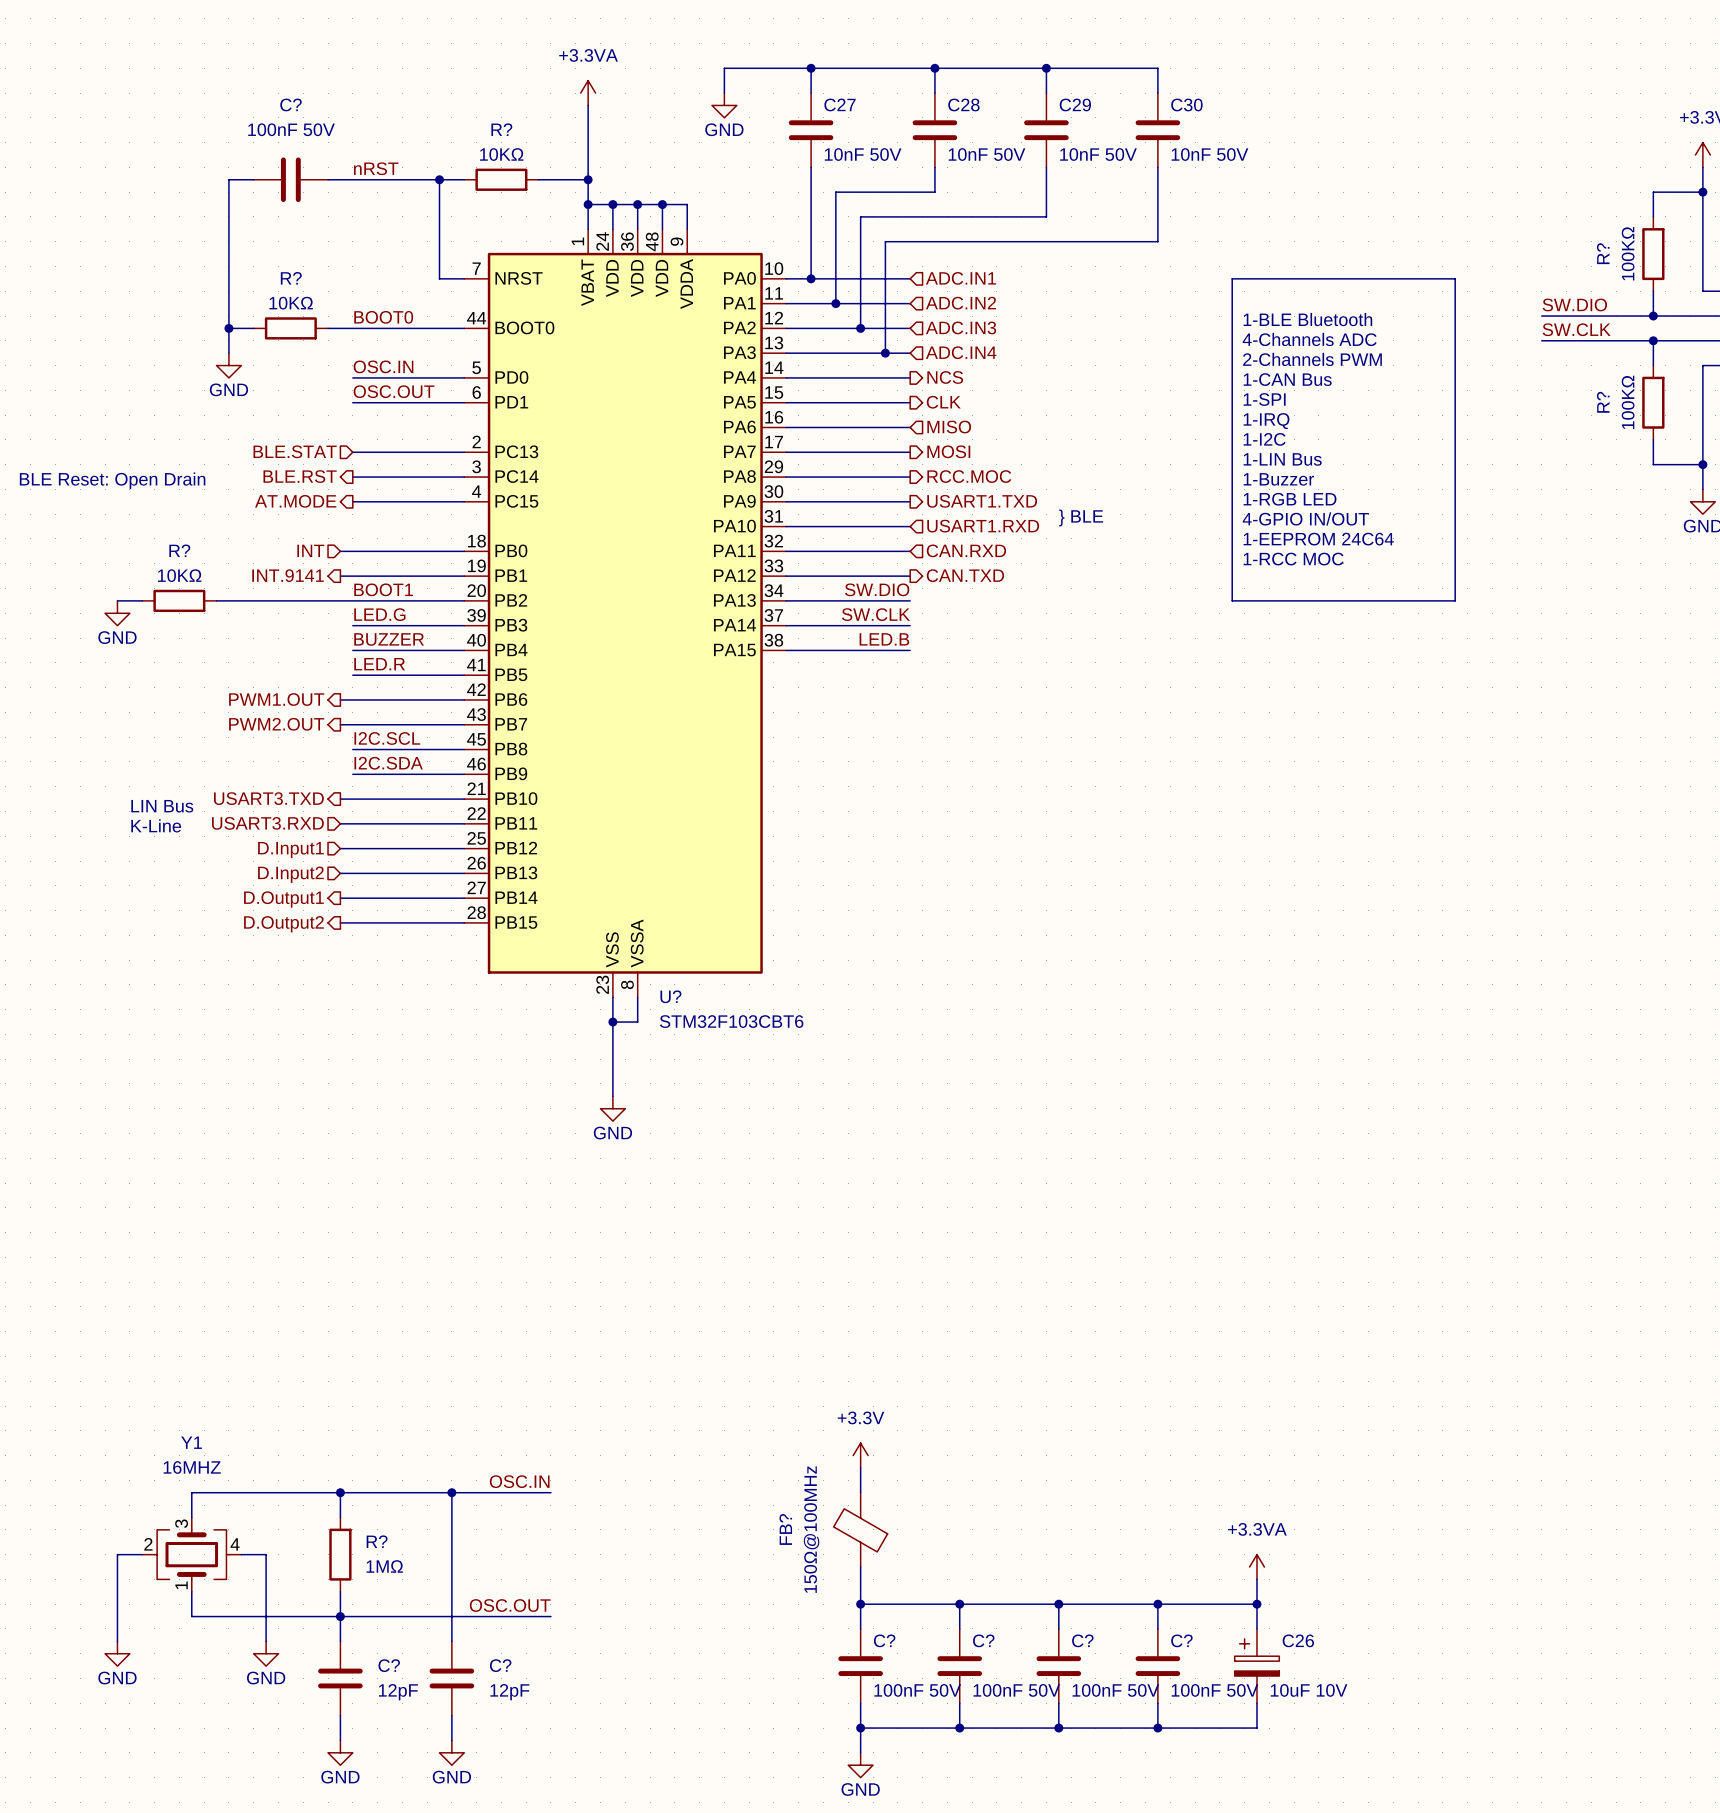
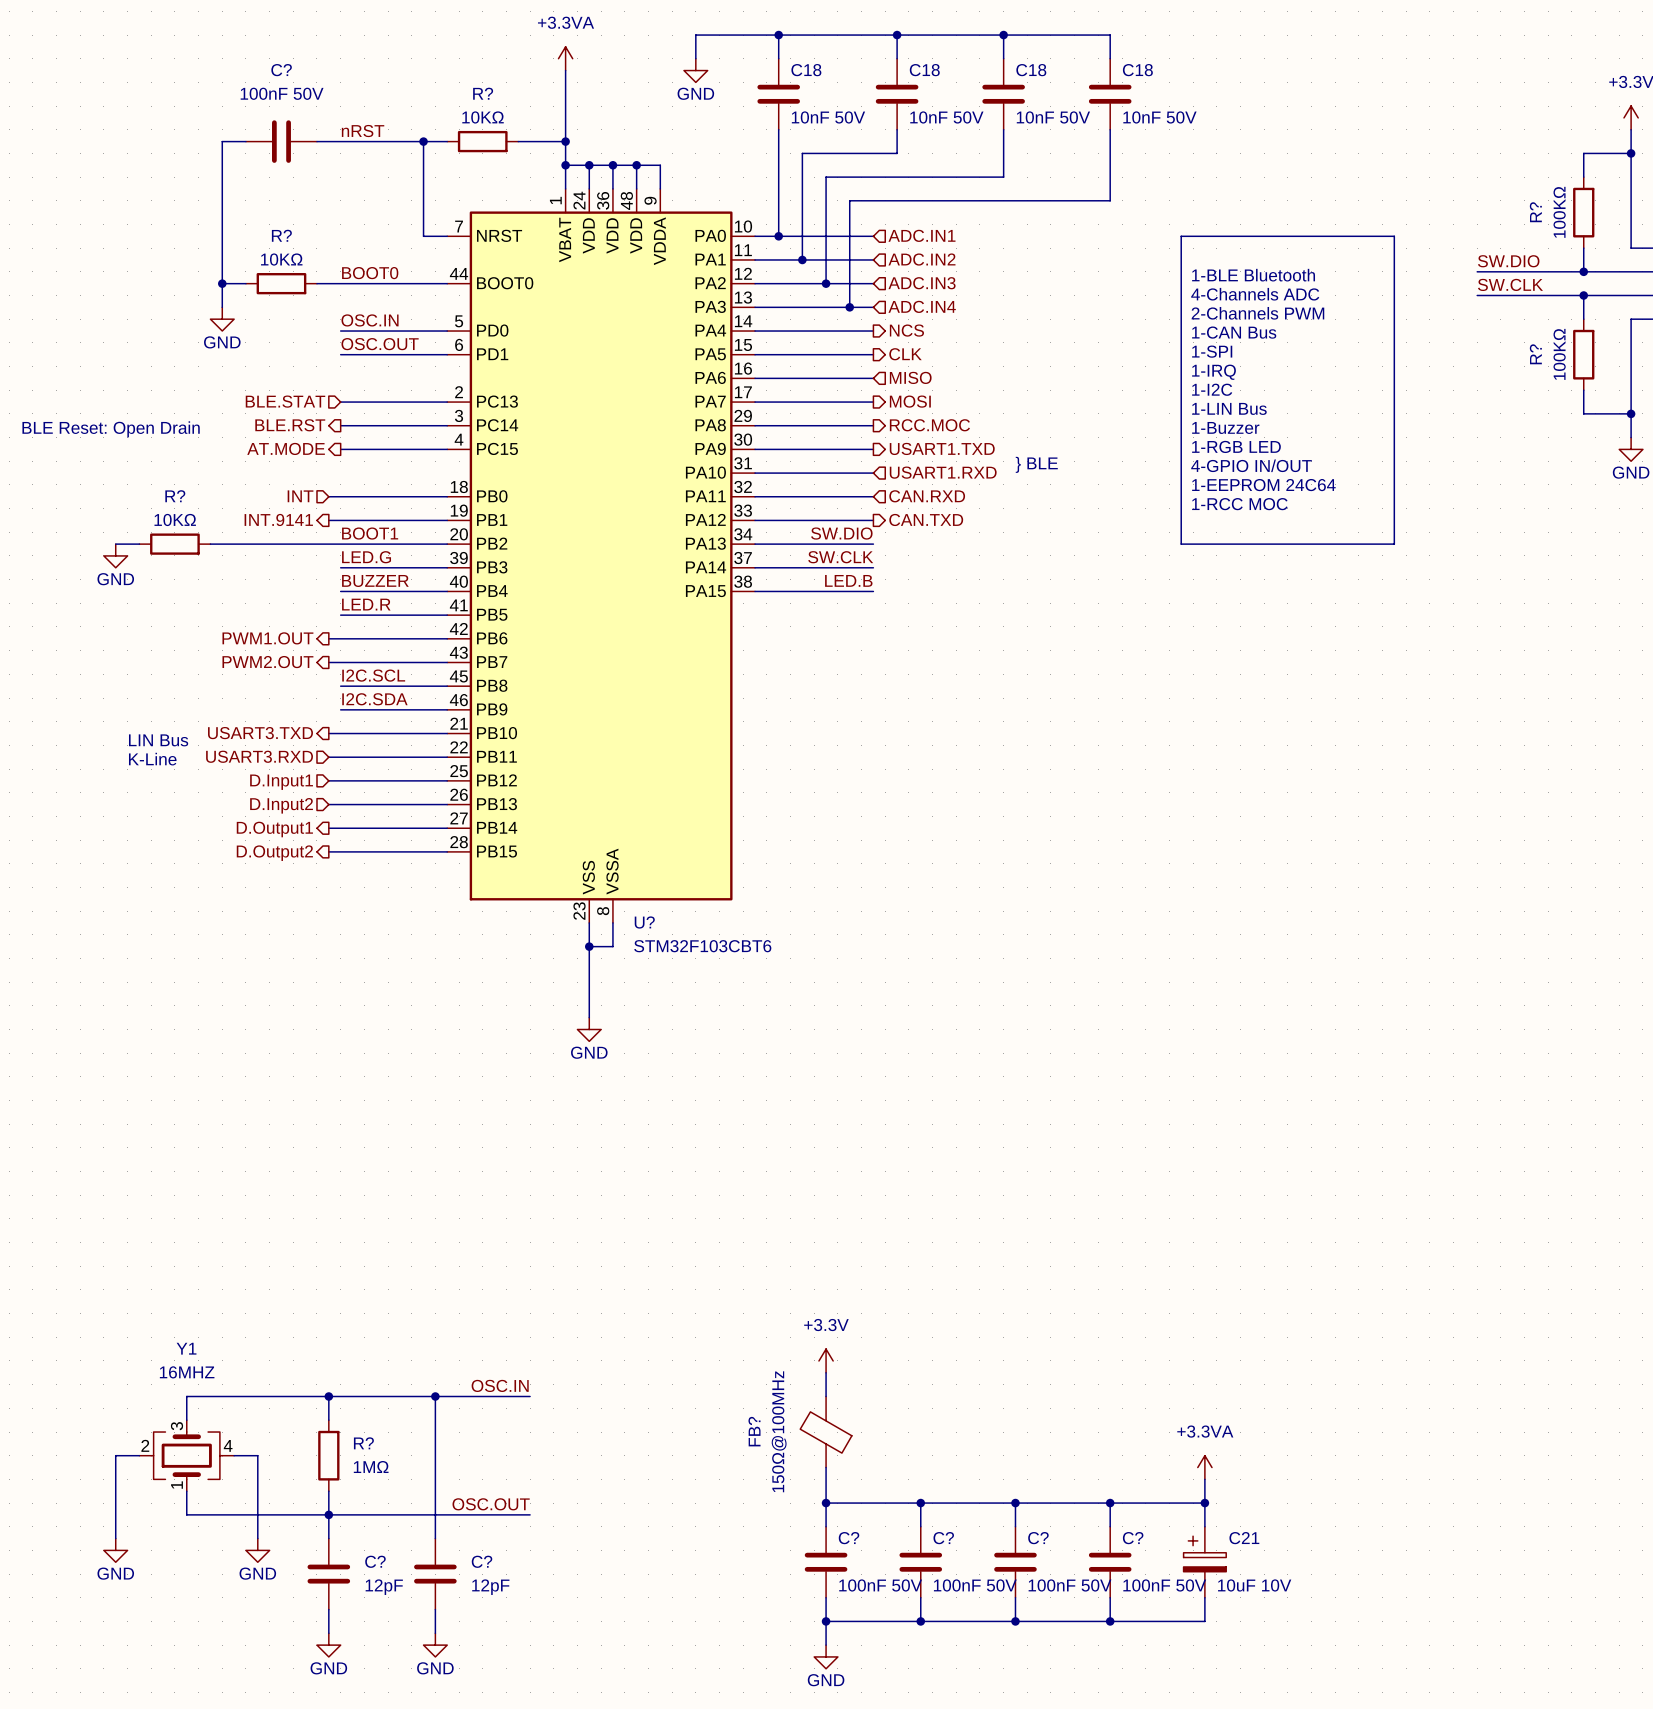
C27 name: C27 (839, 104) -> C18 (806, 70)
C28 name: C28 (963, 104) -> C18 (924, 70)
C29 name: C29 (1075, 104) -> C18 (1031, 70)
C30 name: C30 (1186, 104) -> C18 (1137, 70)
C26 name: C26 (1298, 1640) -> C21 (1244, 1538)

